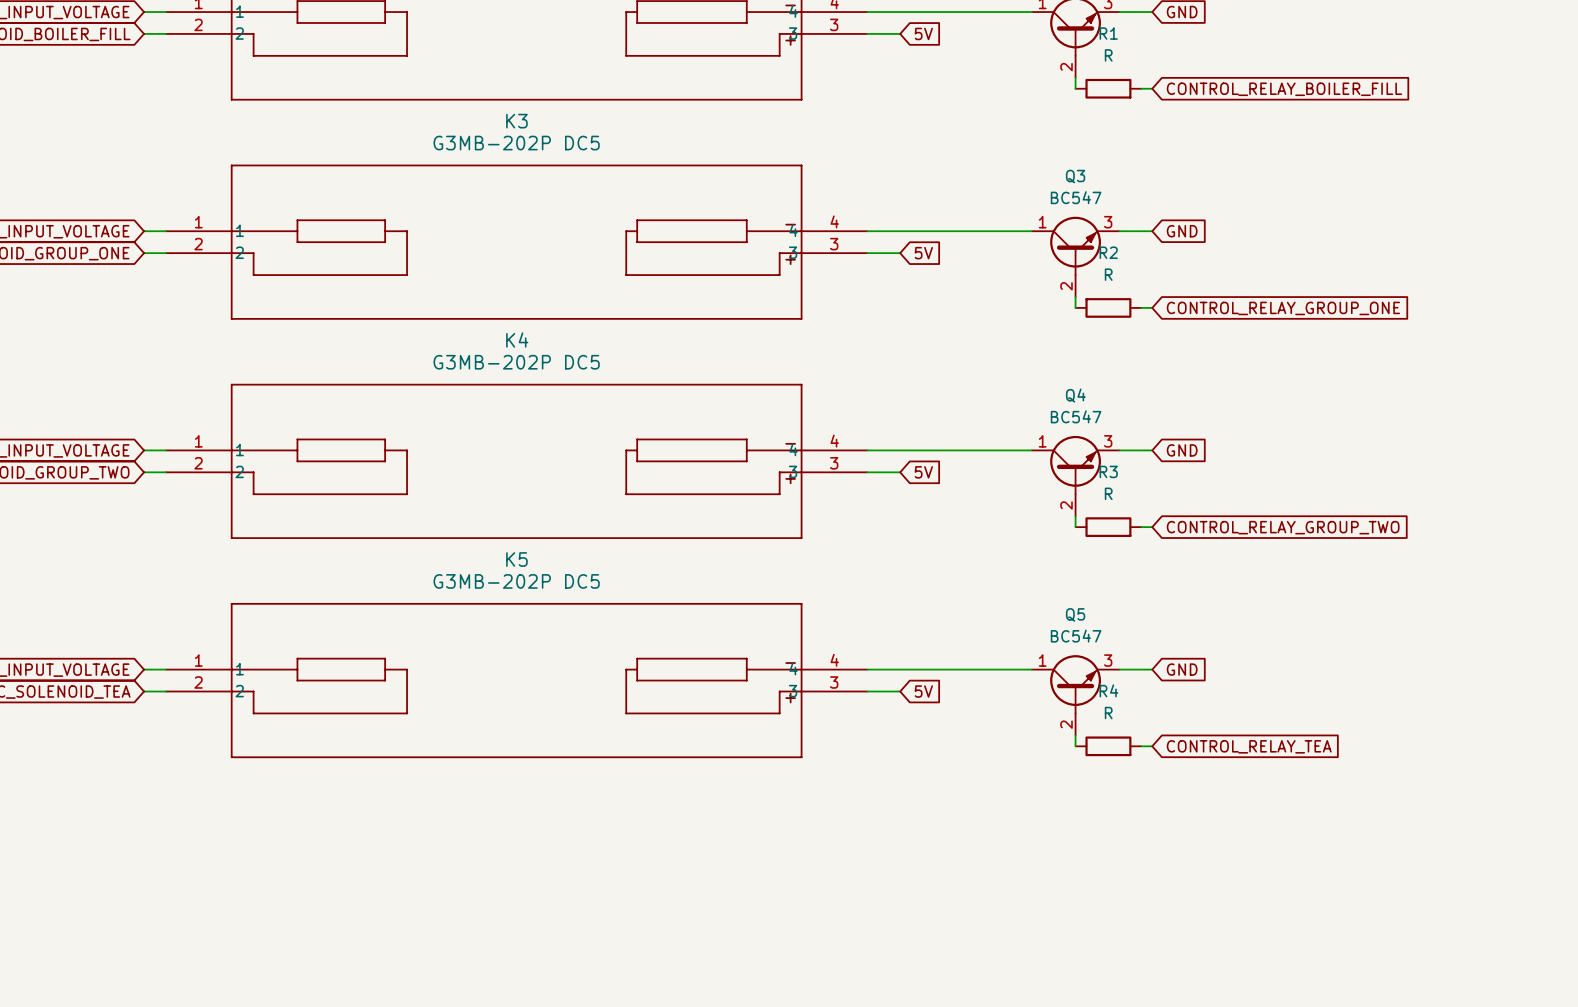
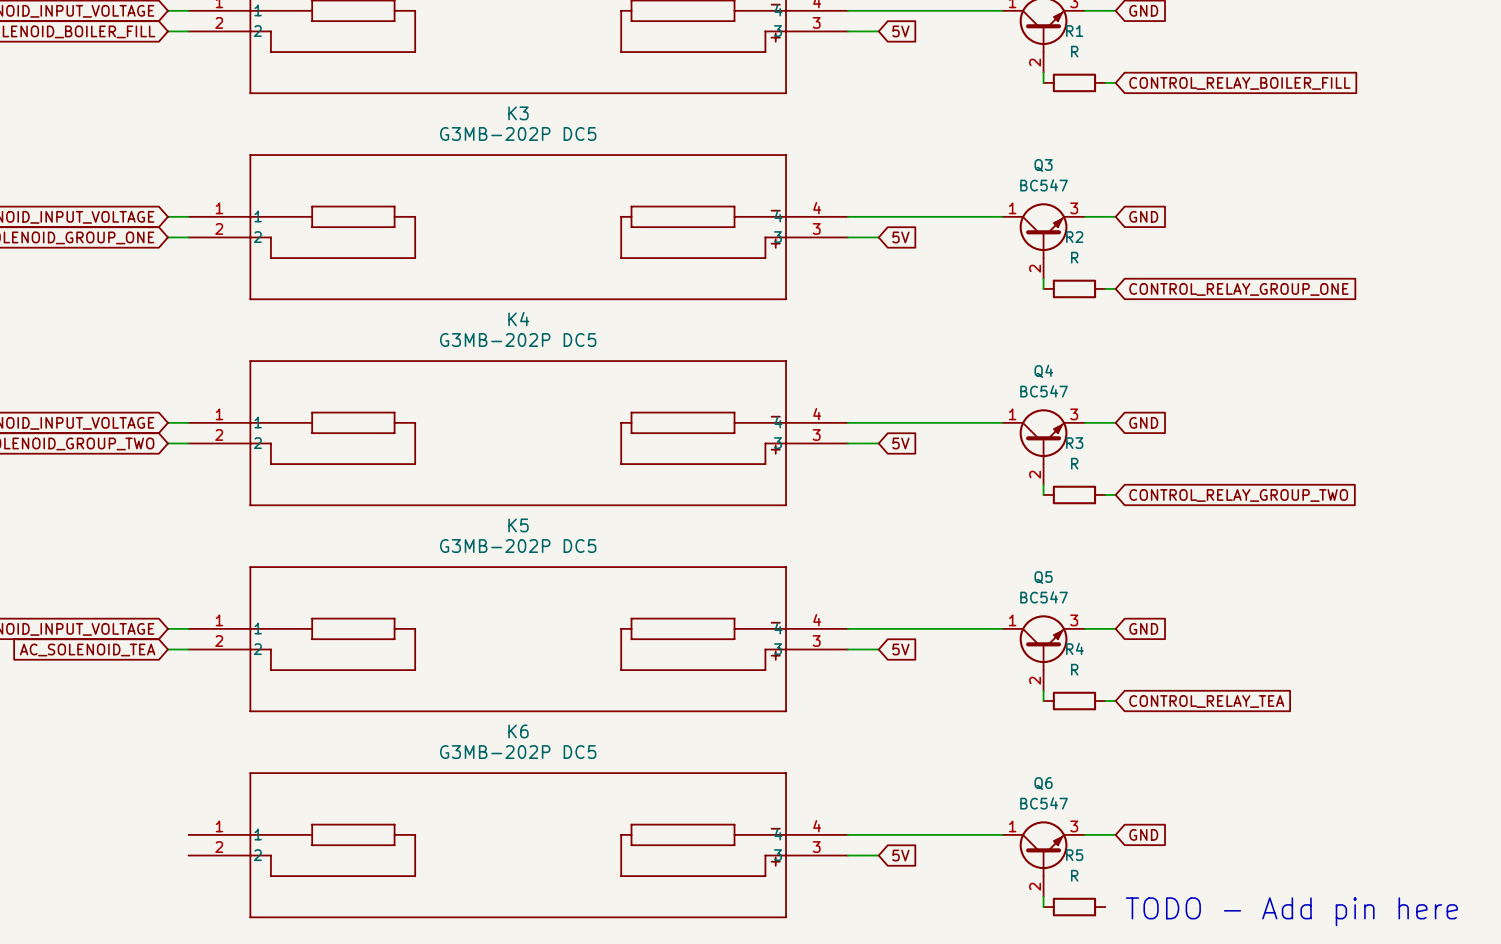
wire: none -> (847, 834) (1002, 834)
wire: none -> (1084, 834) (1115, 834)
global label: none -> GND (1143, 834)
K6: none -> G3MB-202P DC5 (518, 845)
wire: none -> (847, 855) (878, 855)
global label: none -> 5V (900, 855)
Q6: none -> BC547 (1043, 859)
wire: none -> (1043, 896) (1043, 907)
R5: none -> R (1074, 907)
text: none -> TODO - Add pin here (1291, 911)

